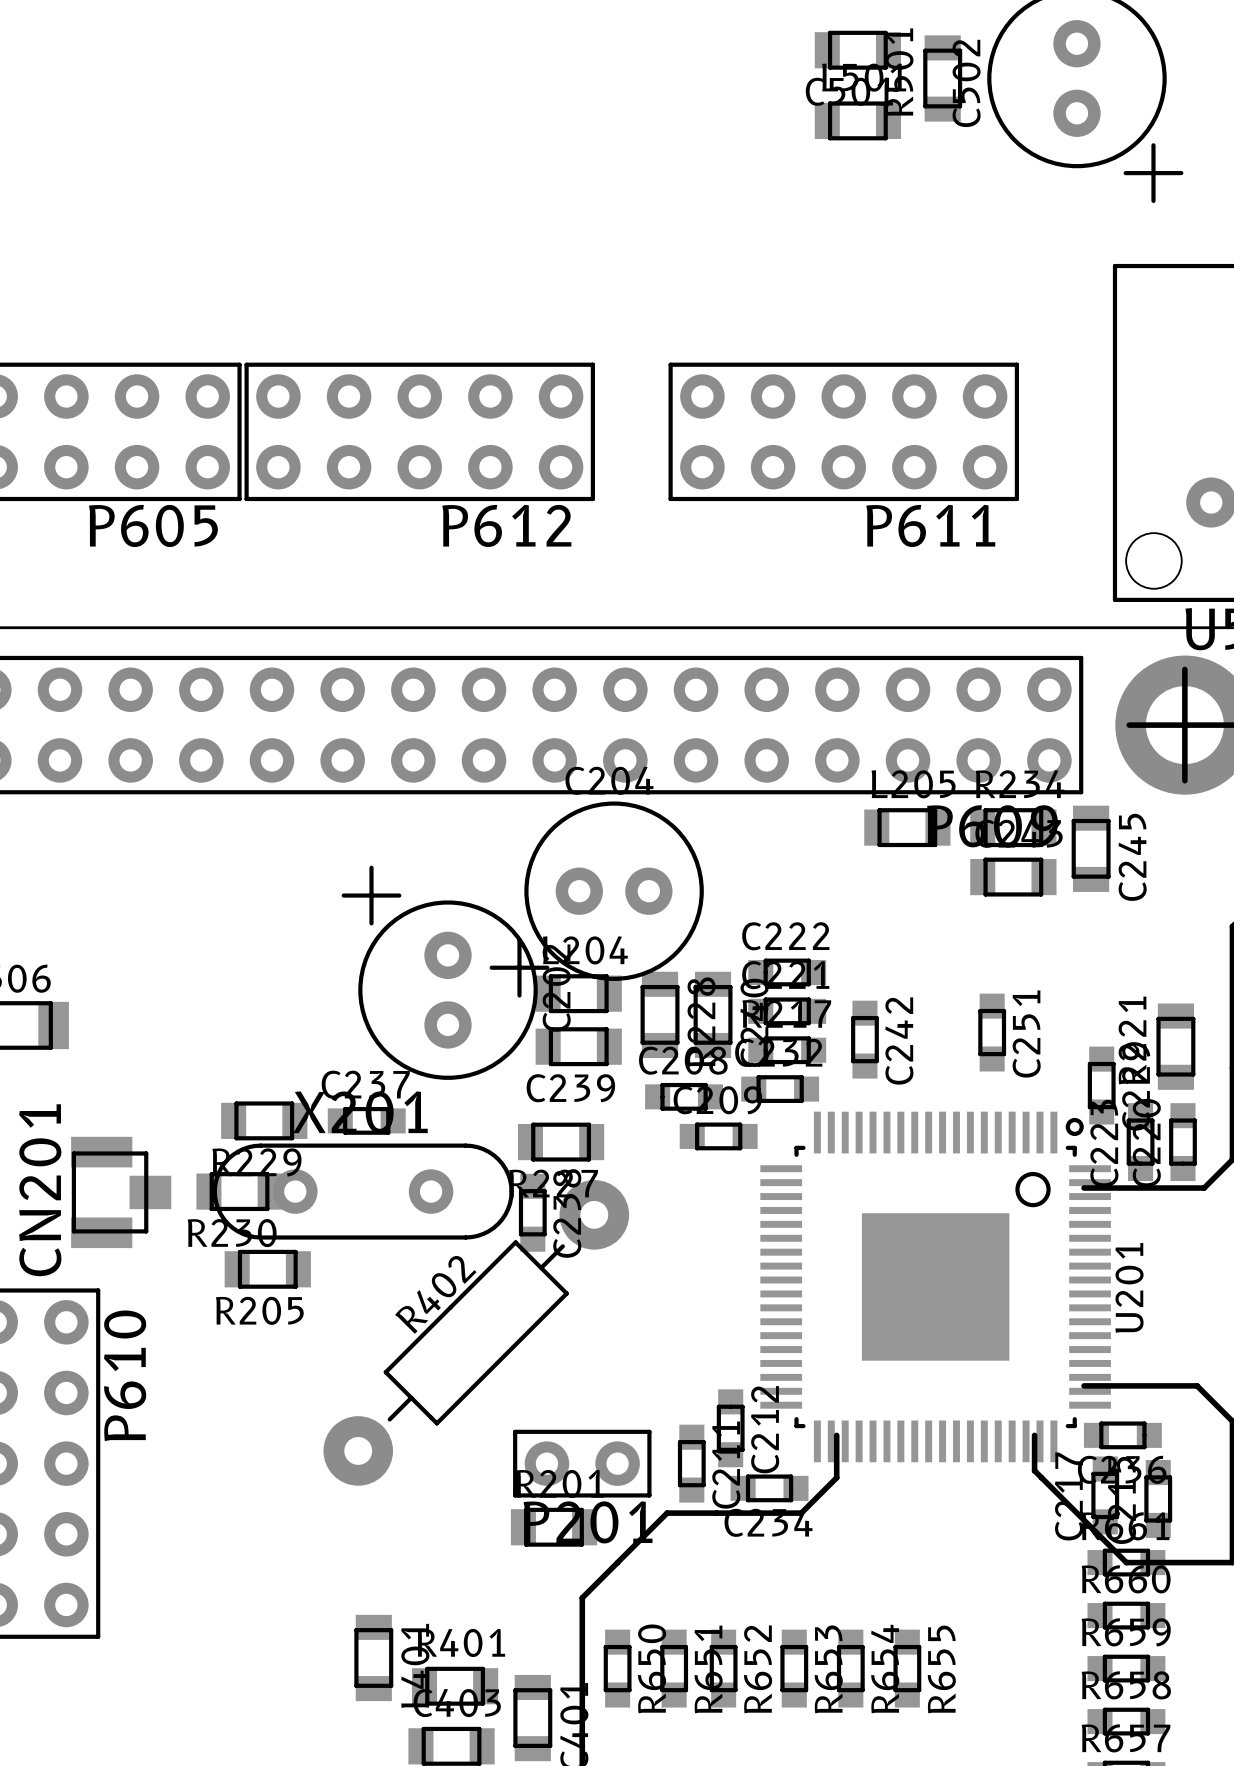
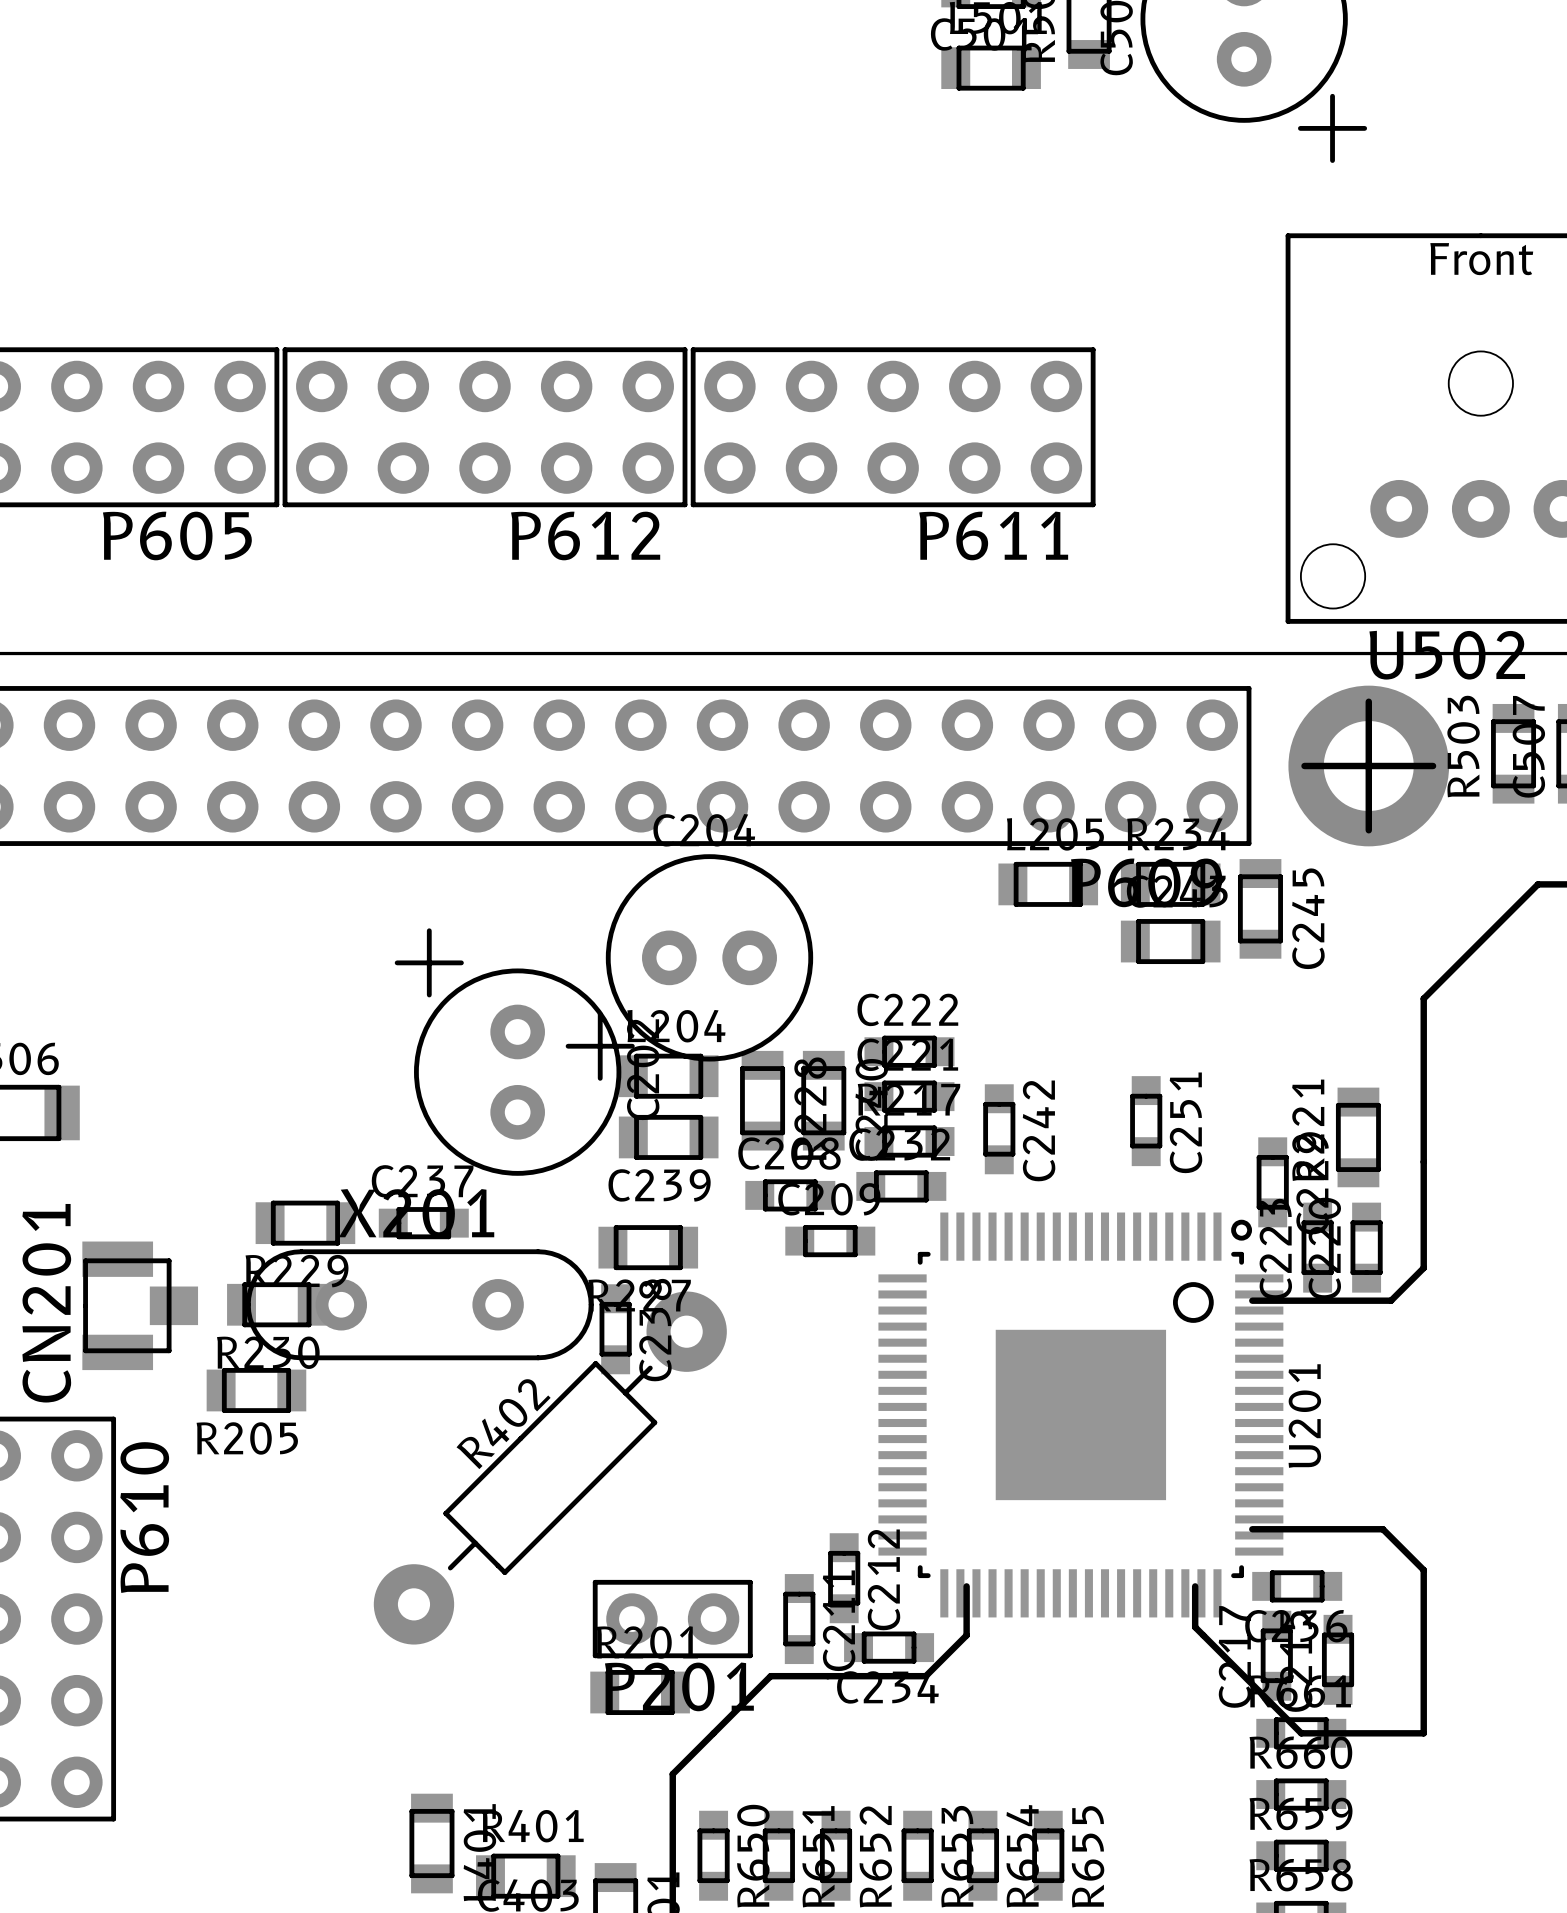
P611 position: (843, 431) -> (893, 427)
R205 position: (267, 1269) -> (256, 1390)

